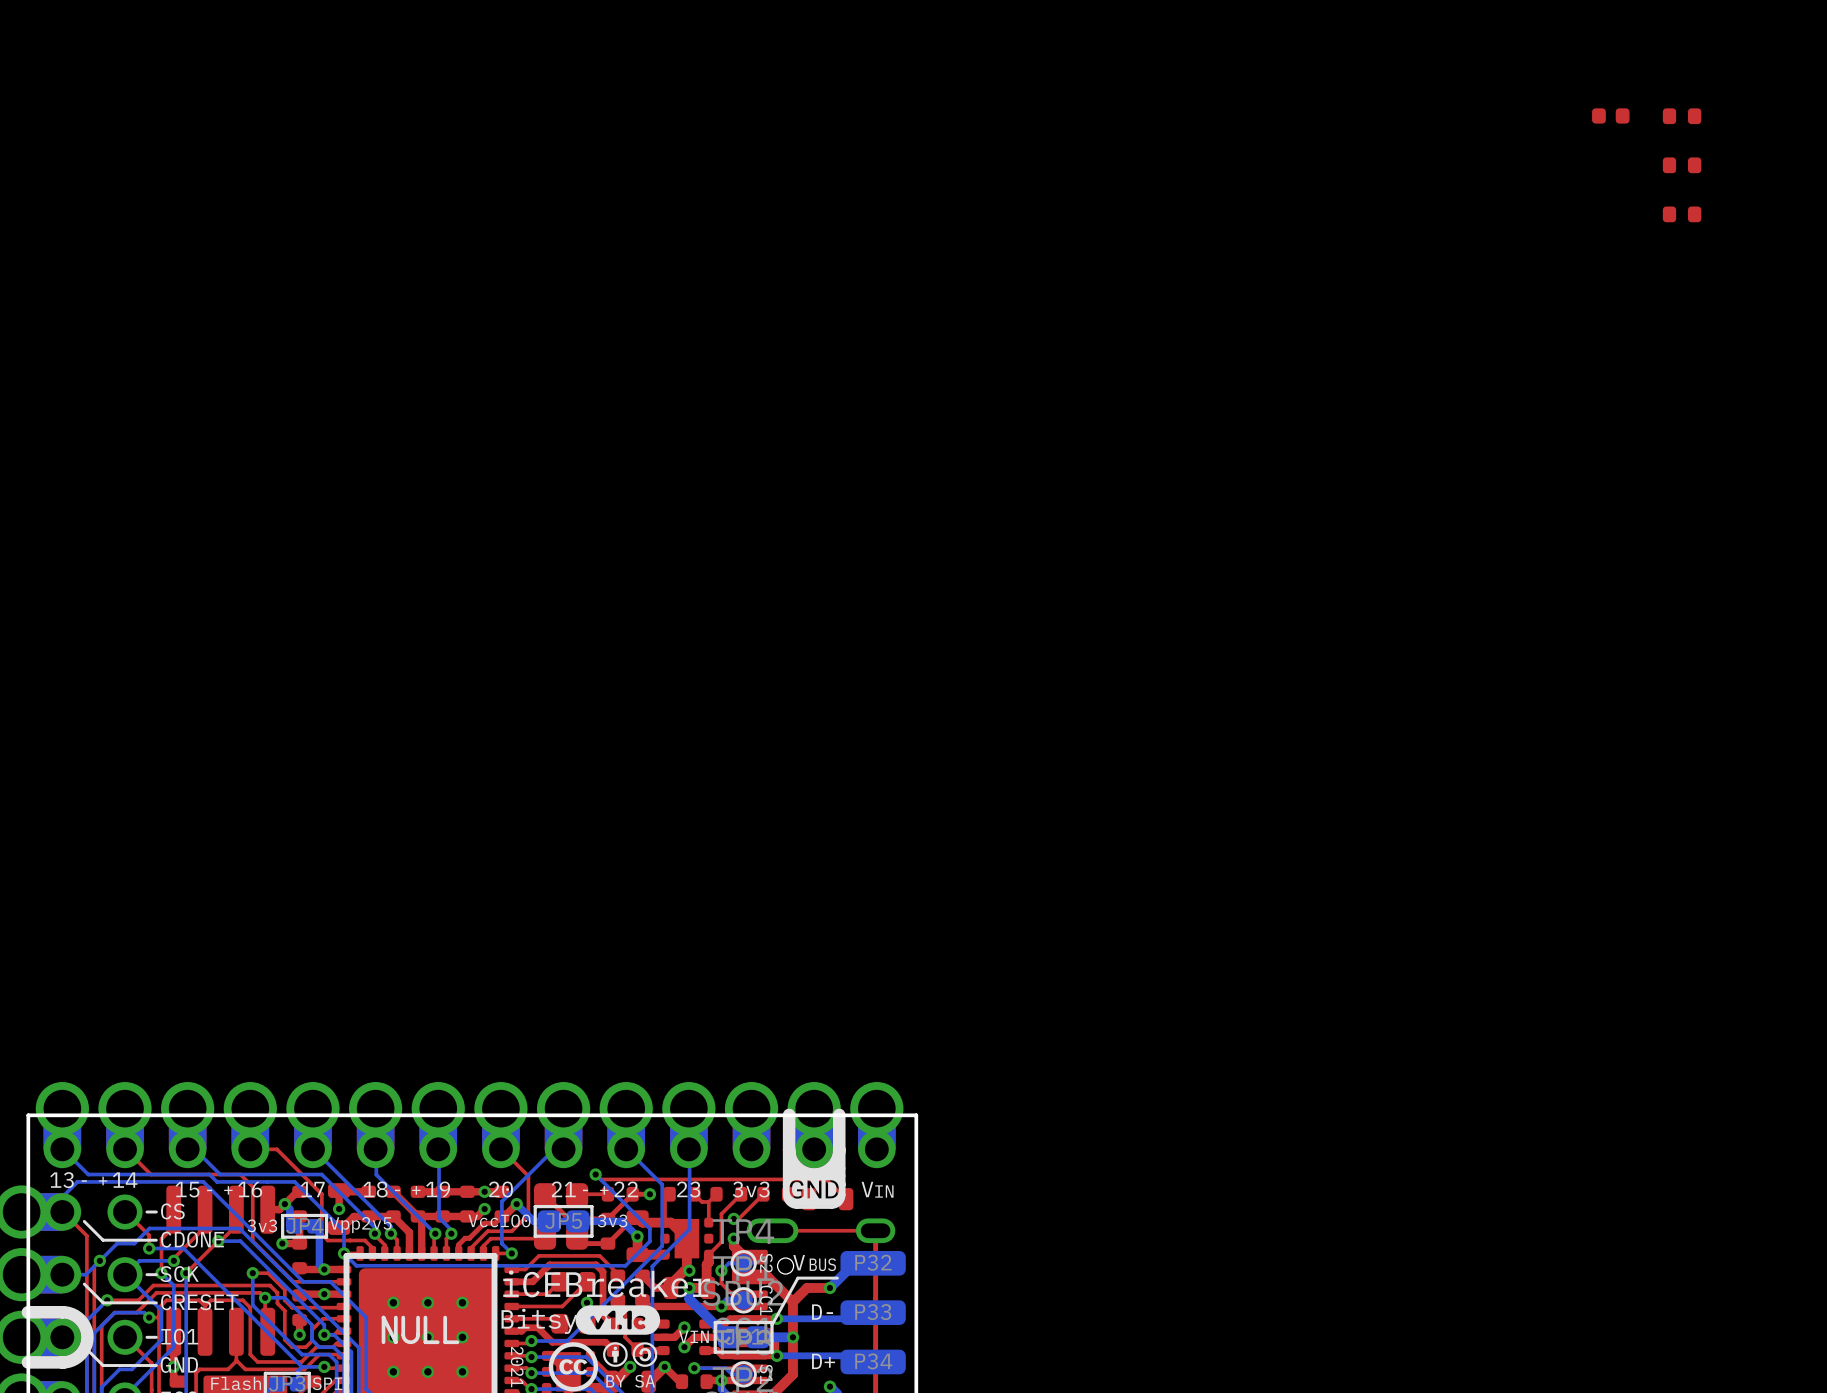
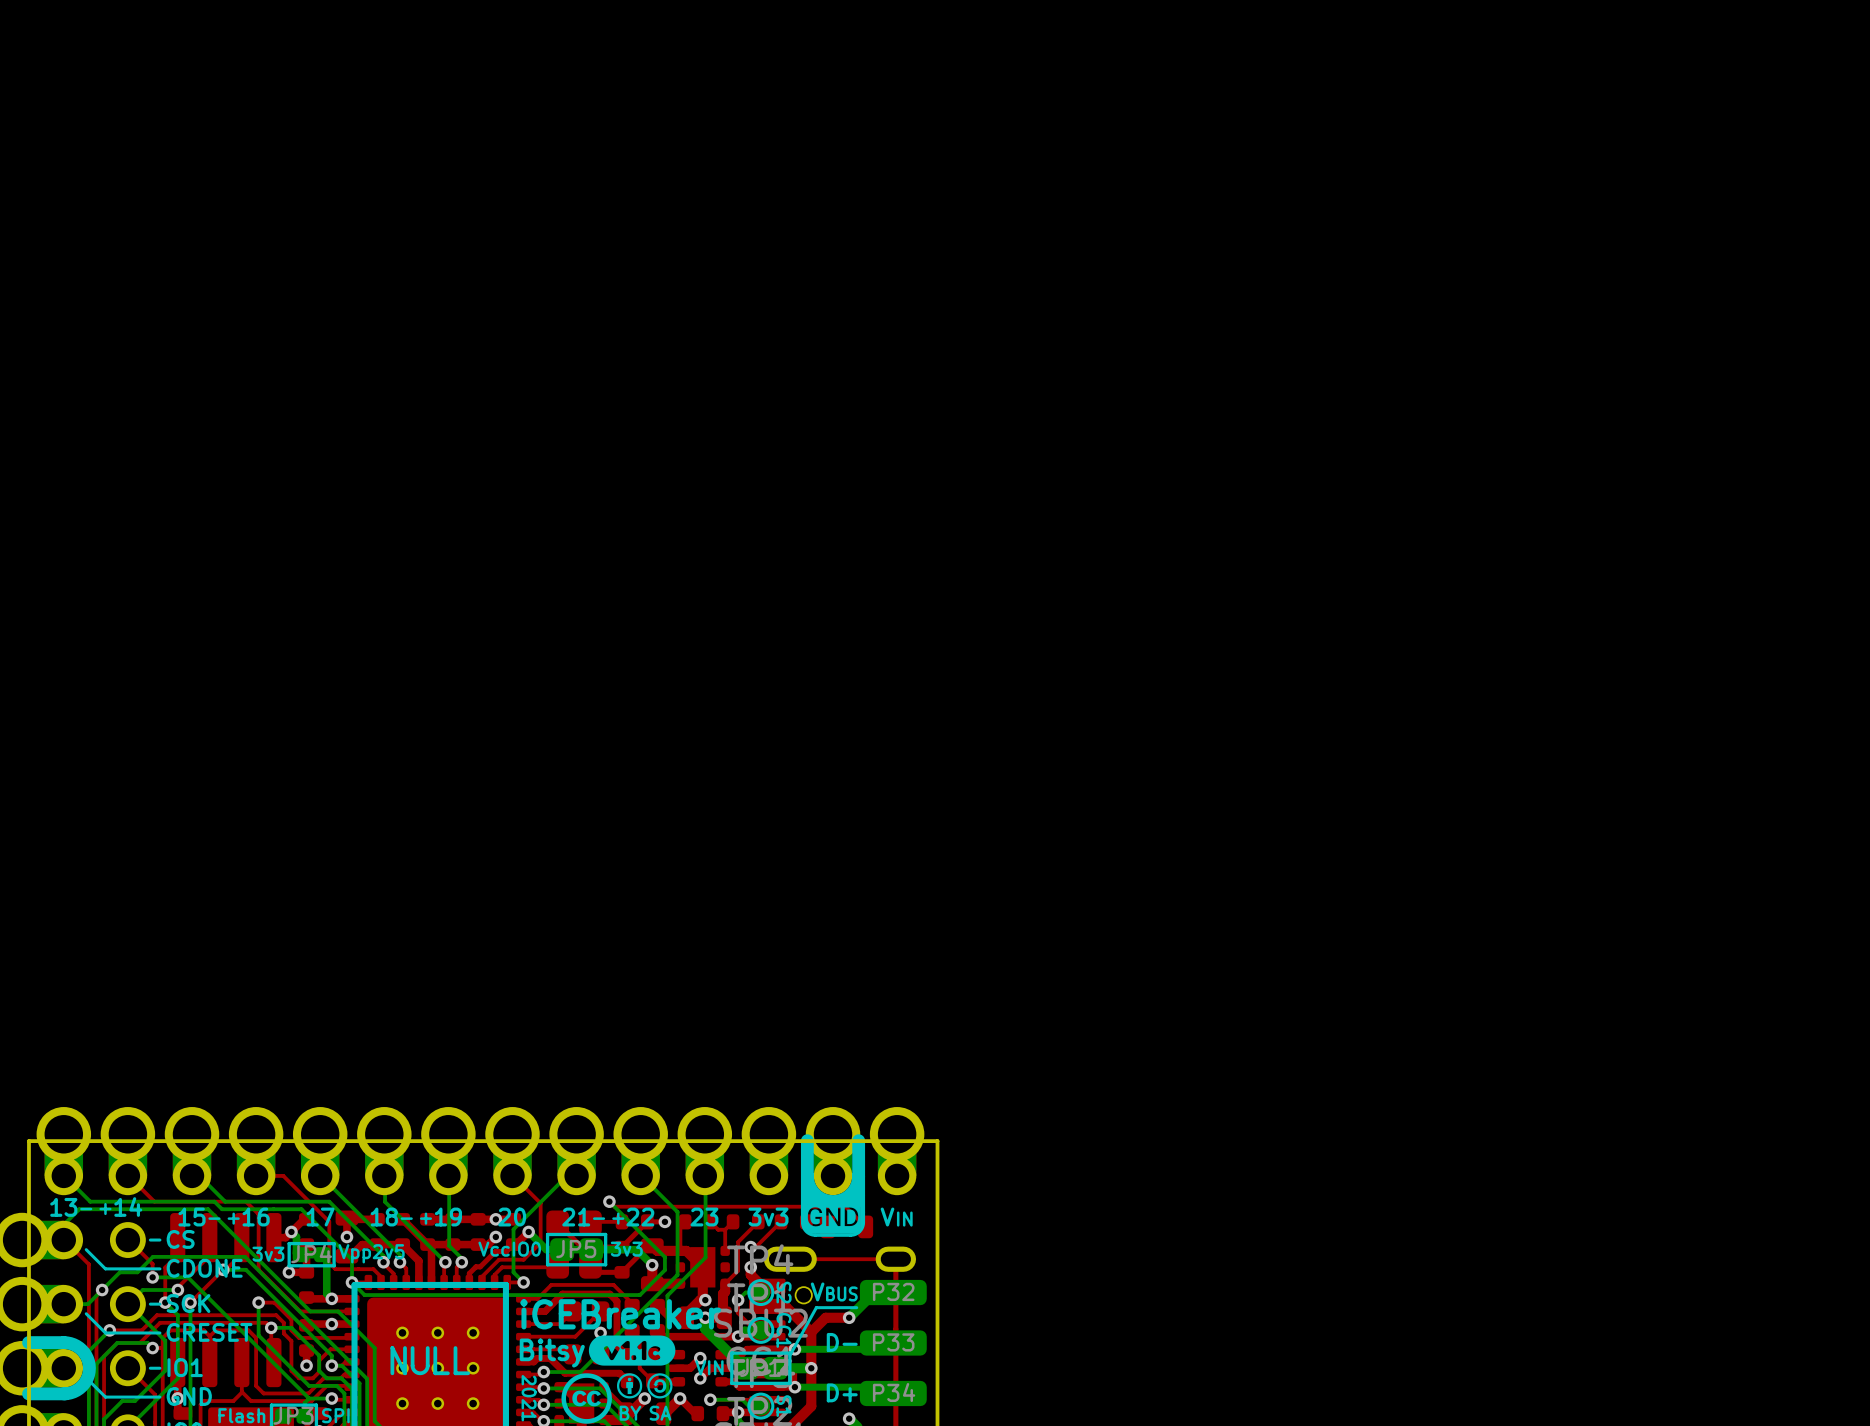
part: (1610, 115) -> none
part: (1682, 116) -> none
part: (1682, 165) -> none
part: (1682, 214) -> none

